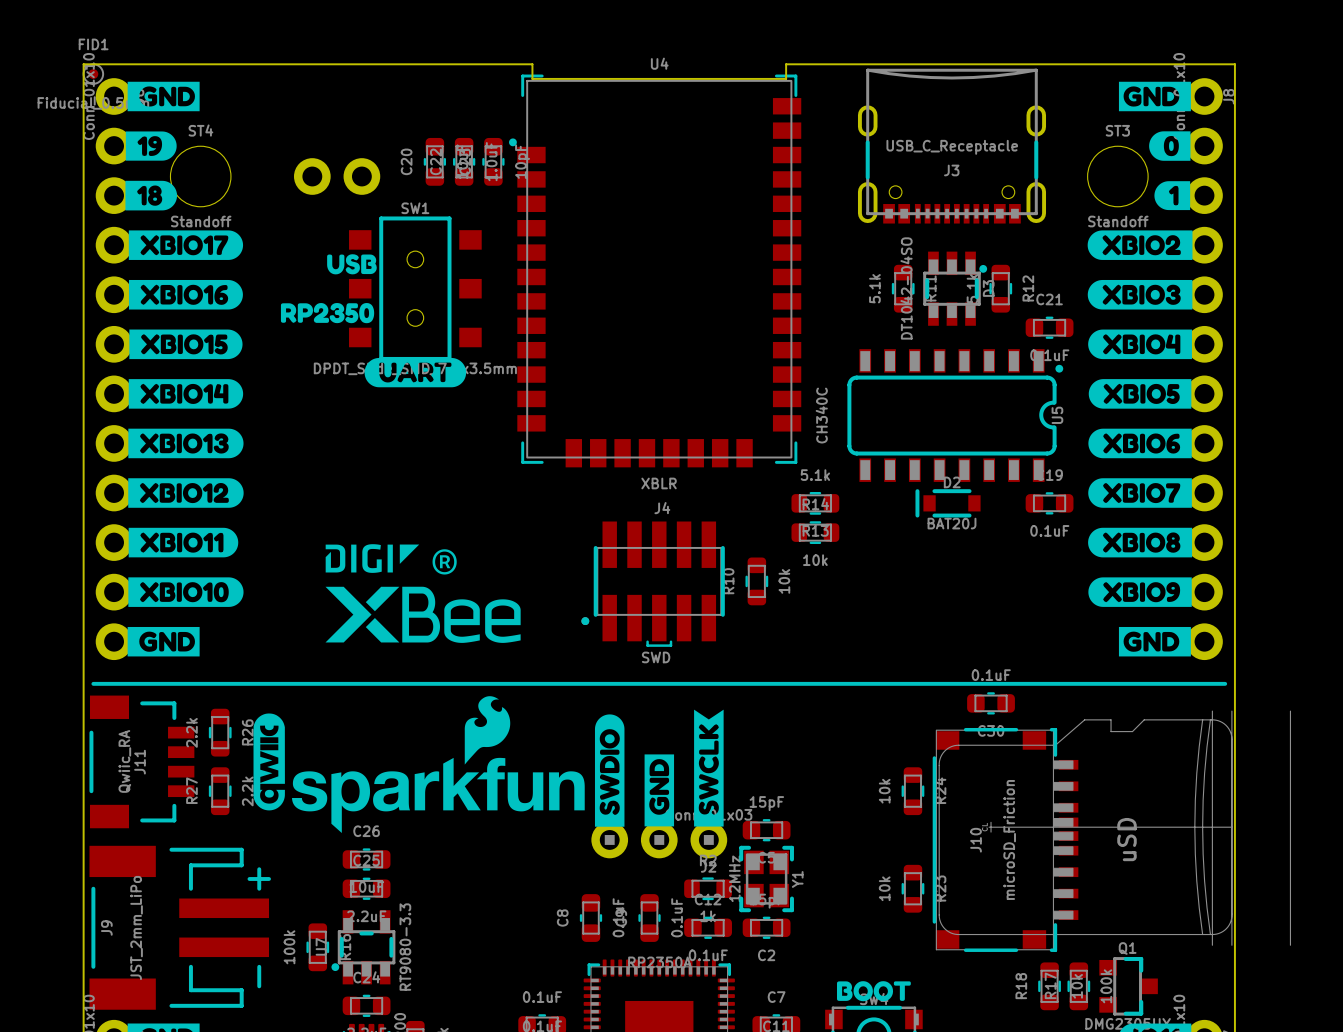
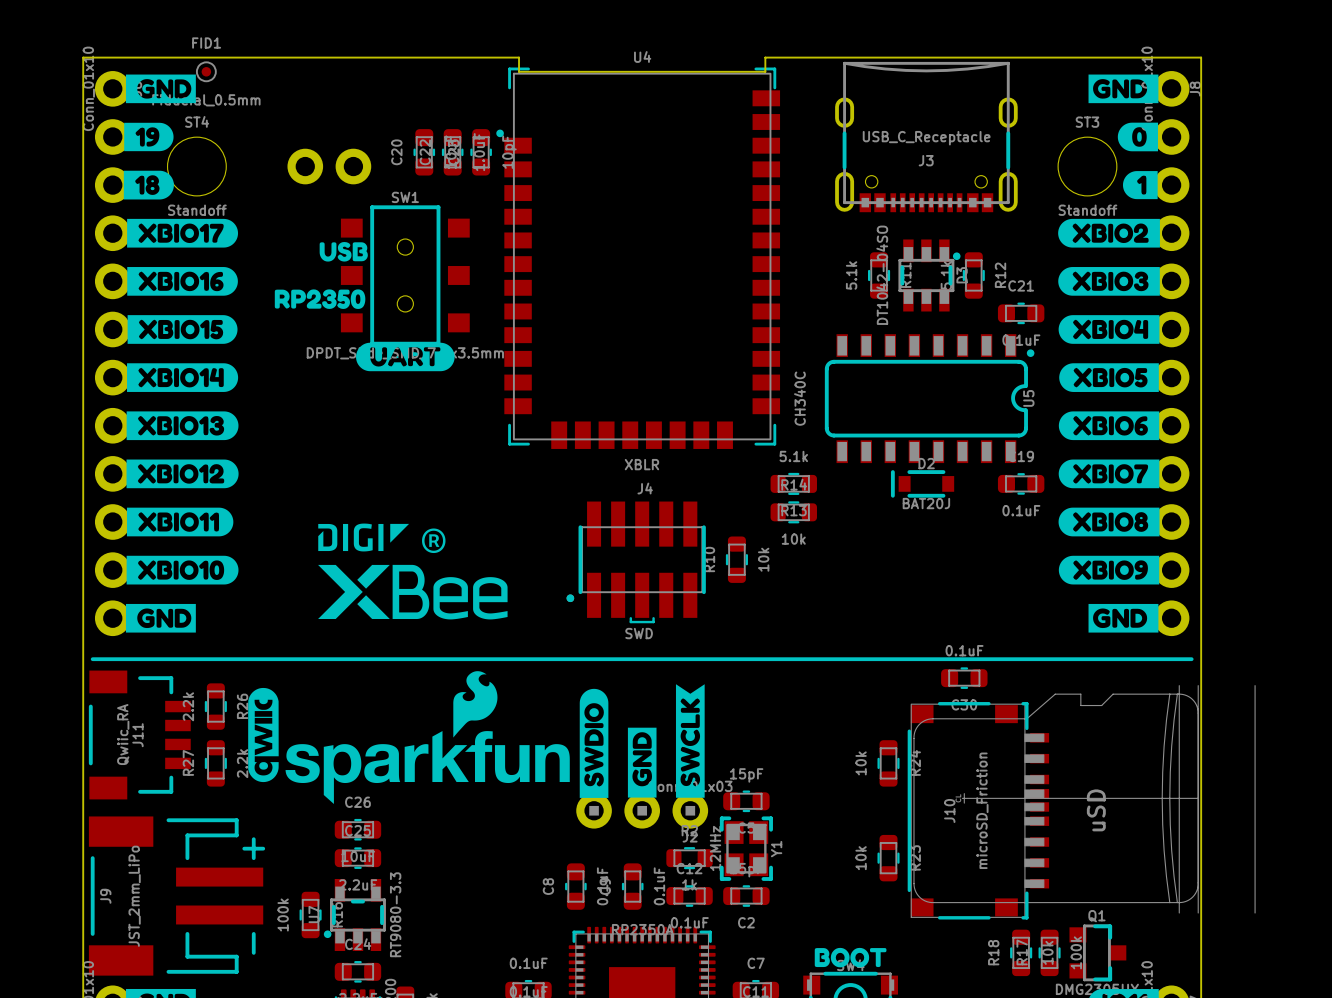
FID1 position: (93, 74) -> (206, 71)

